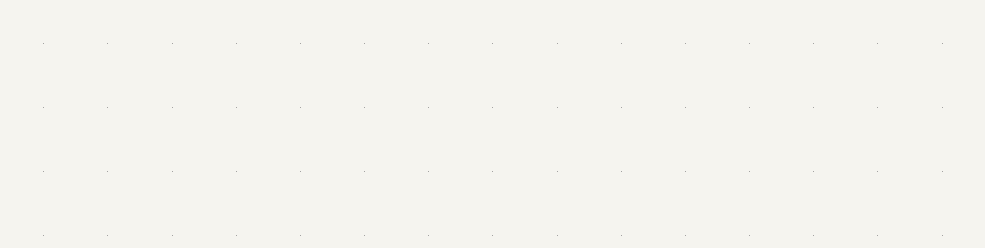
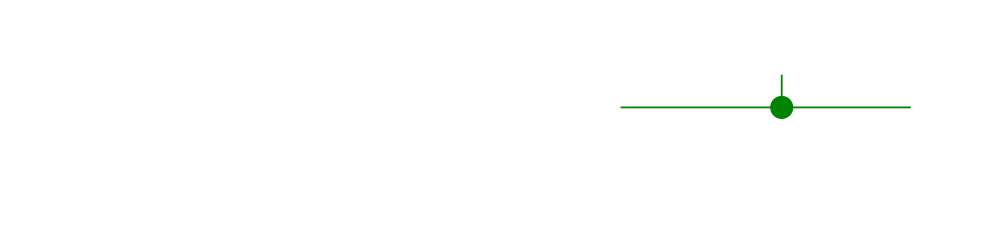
wire: none -> (781, 75) (781, 107)
wire: none -> (621, 107) (910, 107)
junction: none -> (781, 107)

